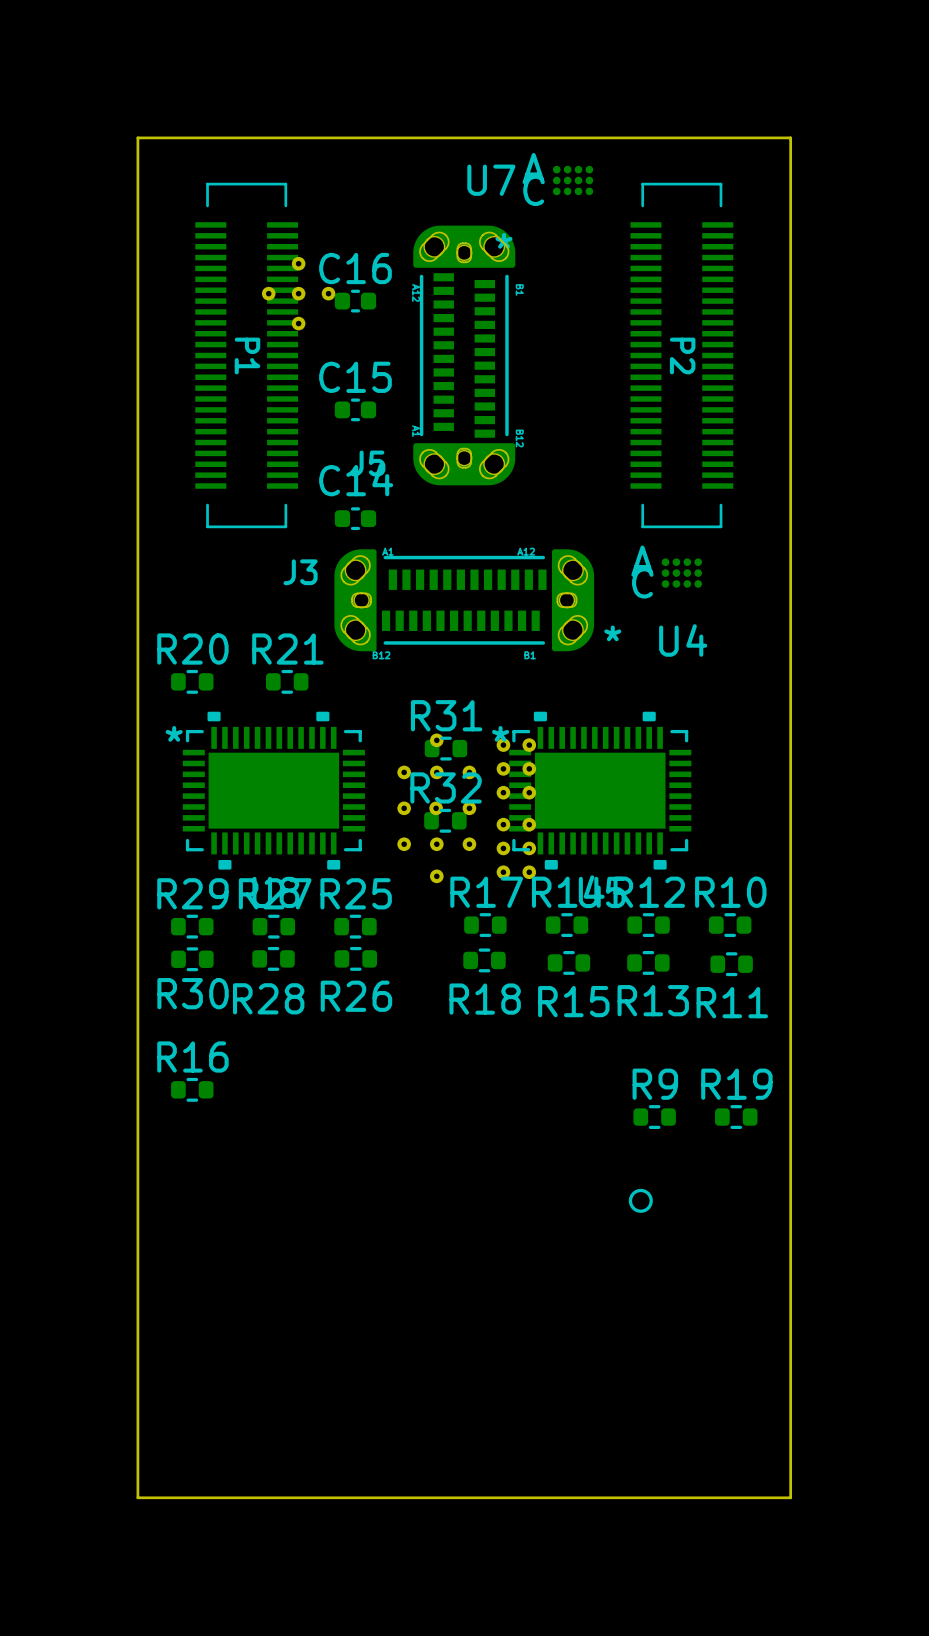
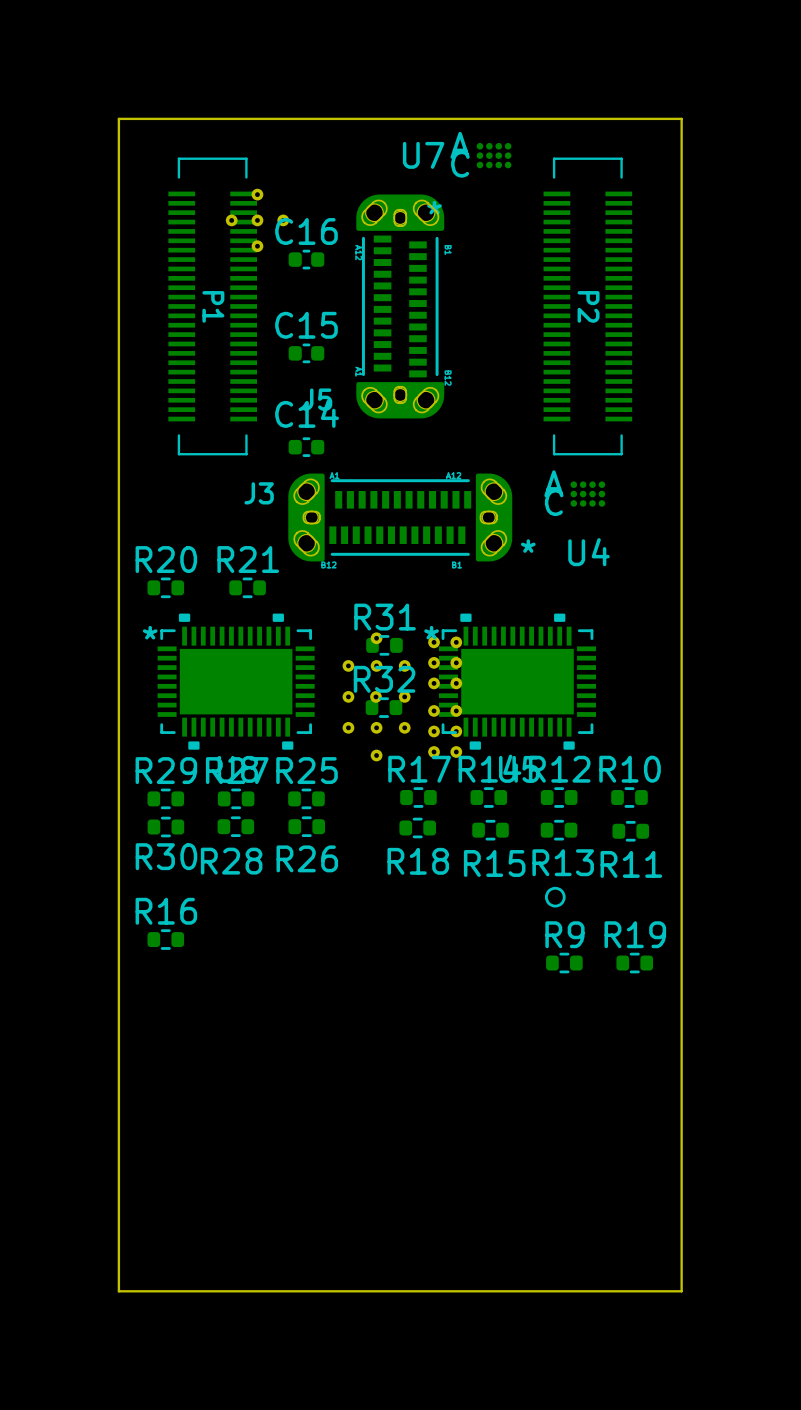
part position: (298, 293) -> (257, 220)
part position: (640, 1200) -> (555, 897)

